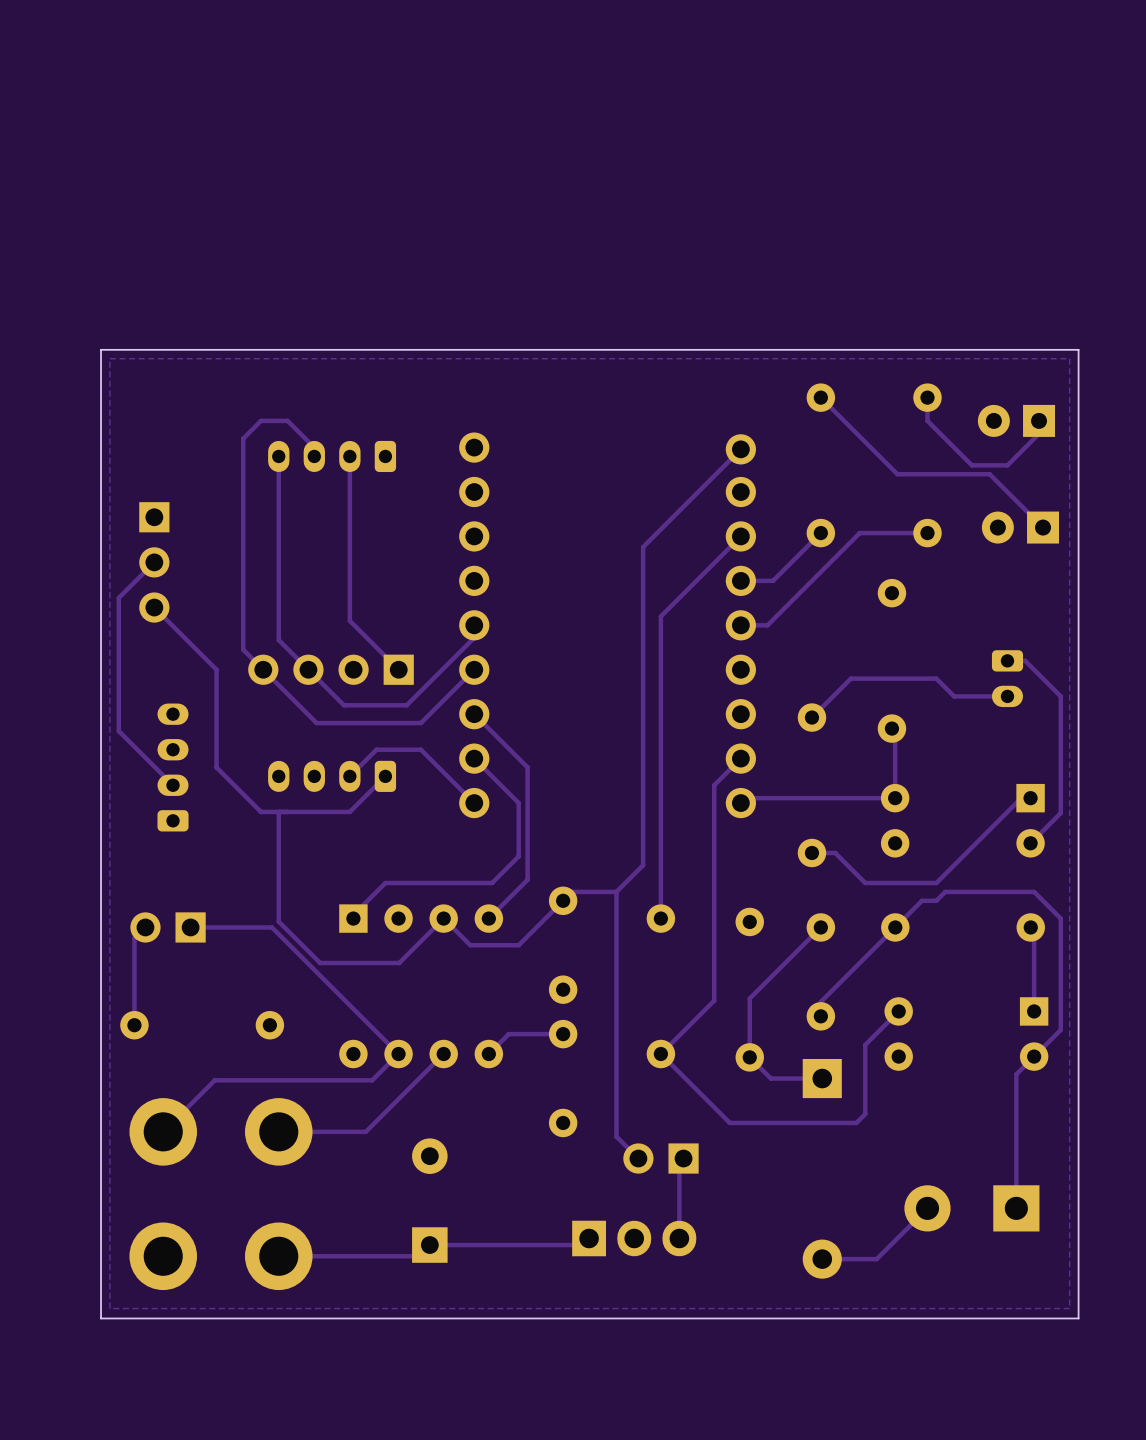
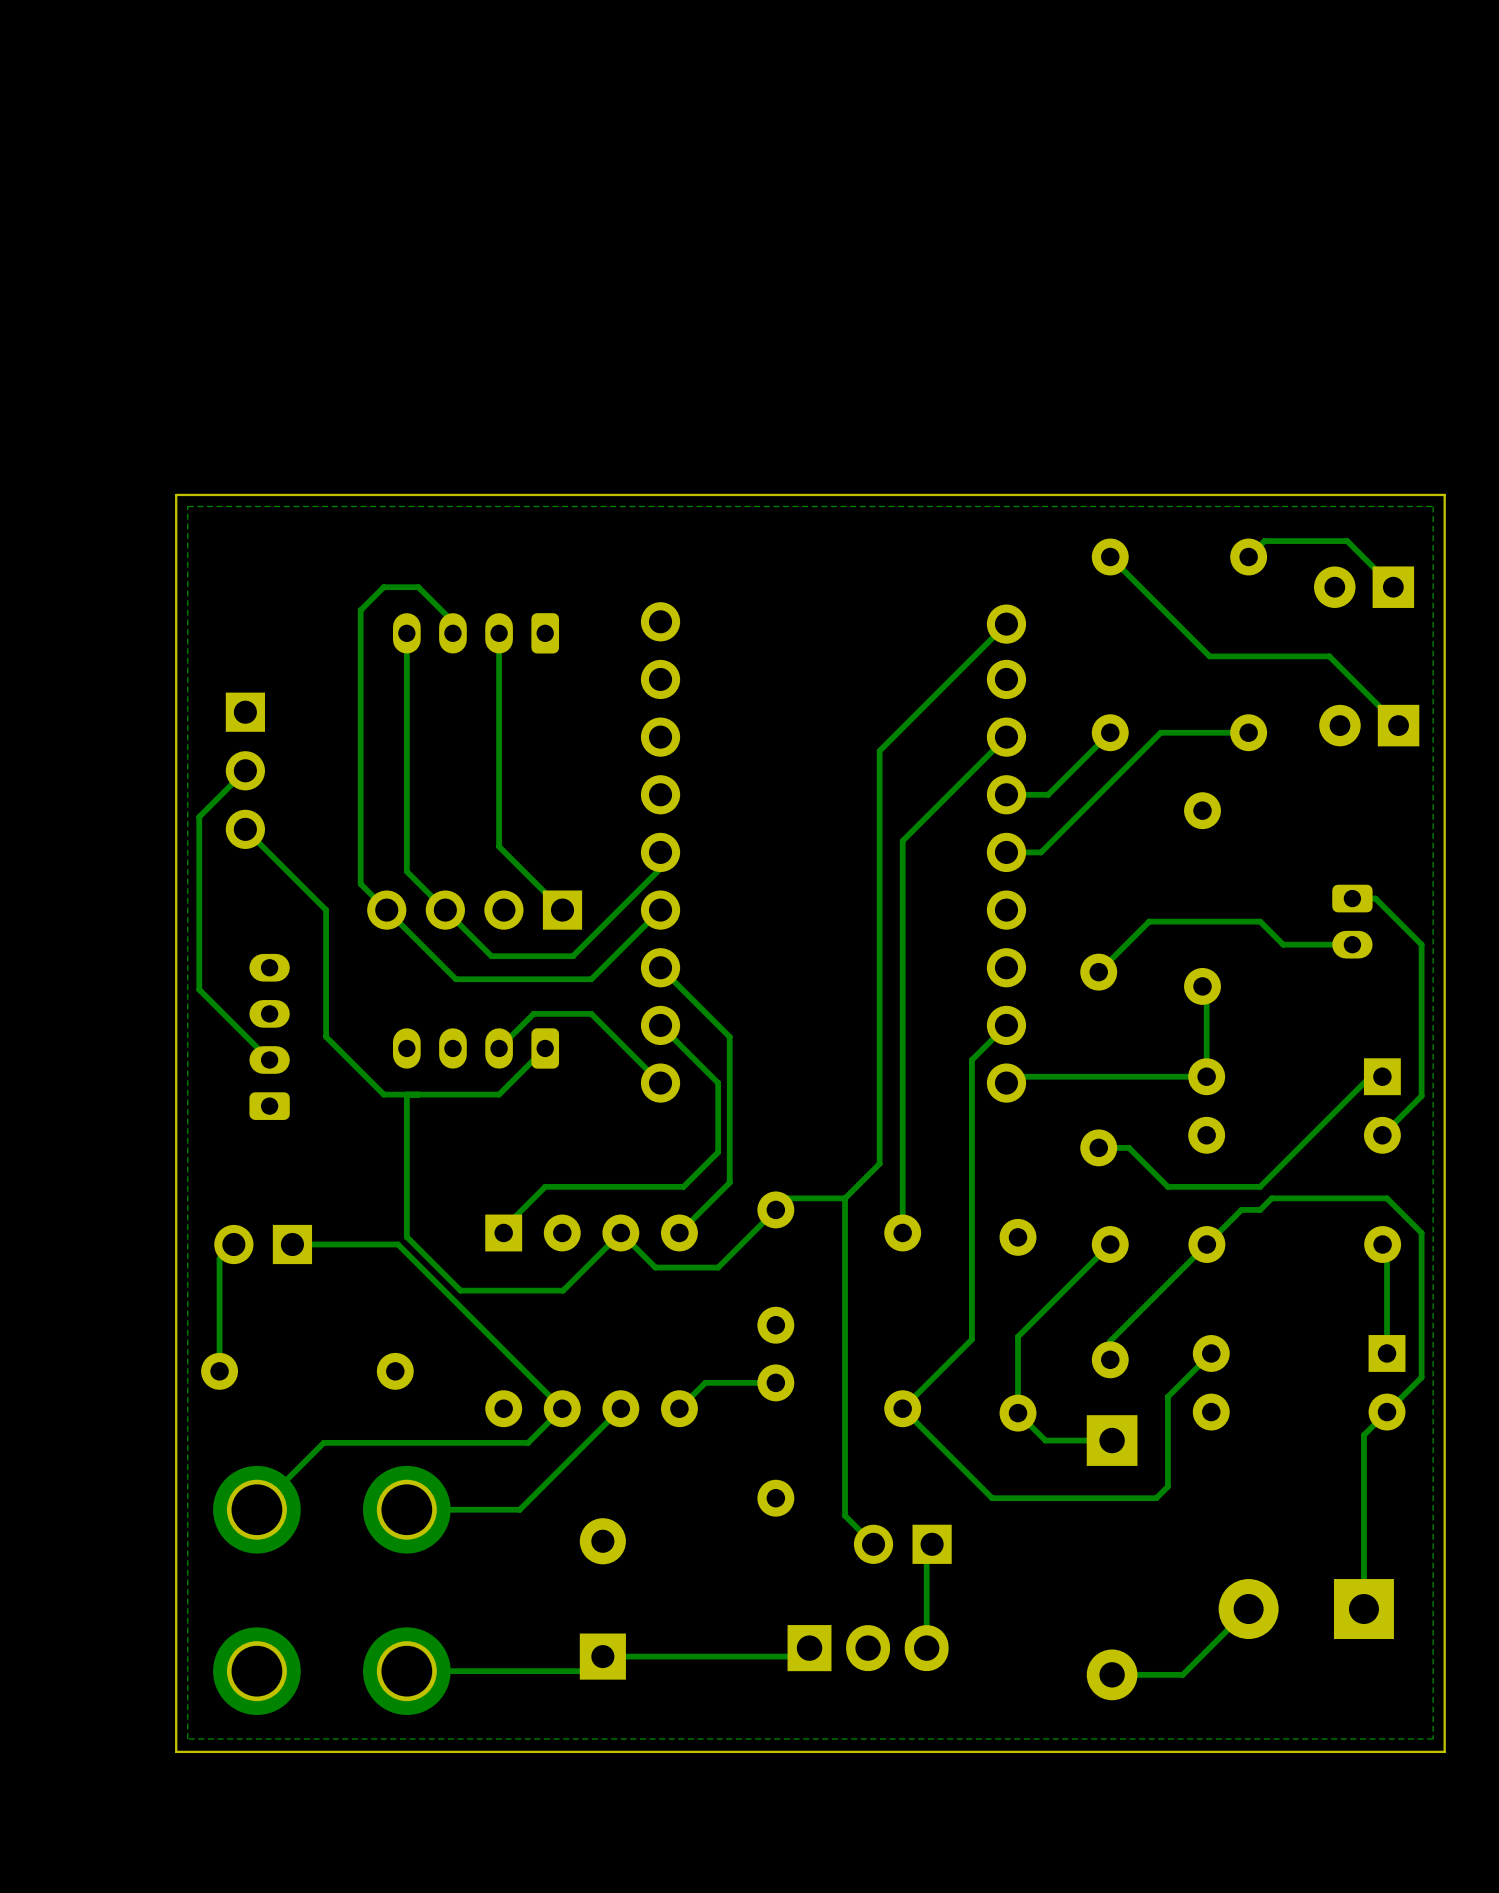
track: (927, 397) (927, 420) (971, 465) (1007, 465) (1039, 433) (1039, 420) -> (1248, 556) (1264, 541) (1347, 541) (1393, 587)

